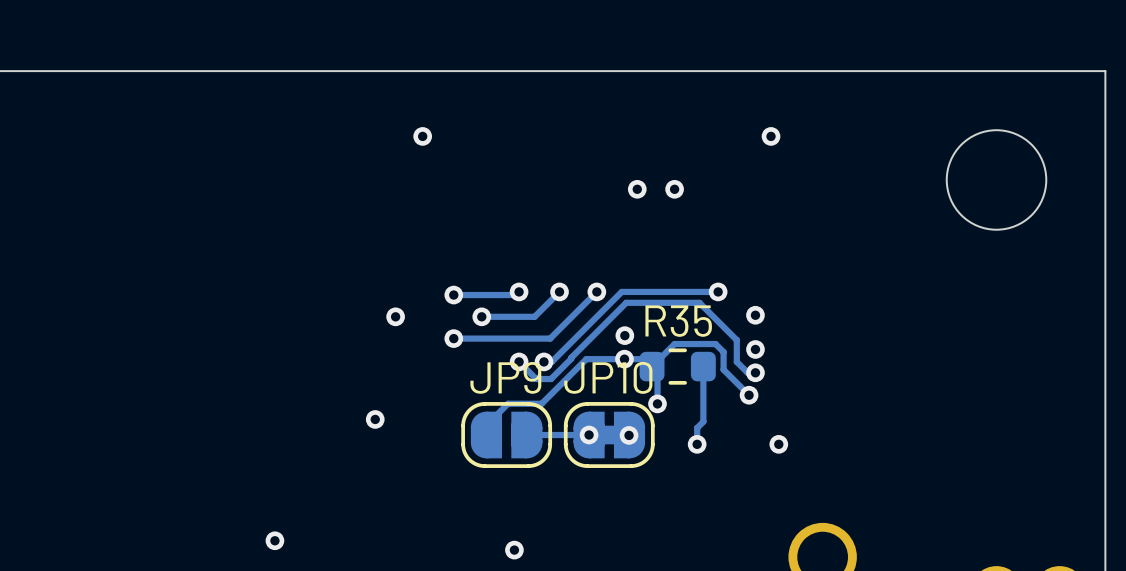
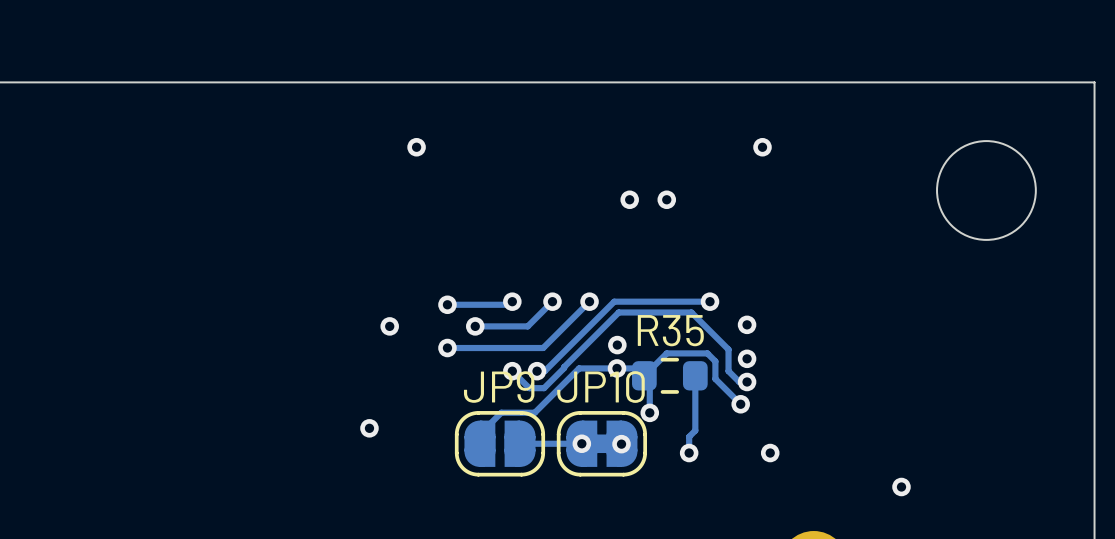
via: none -> (901, 487)

